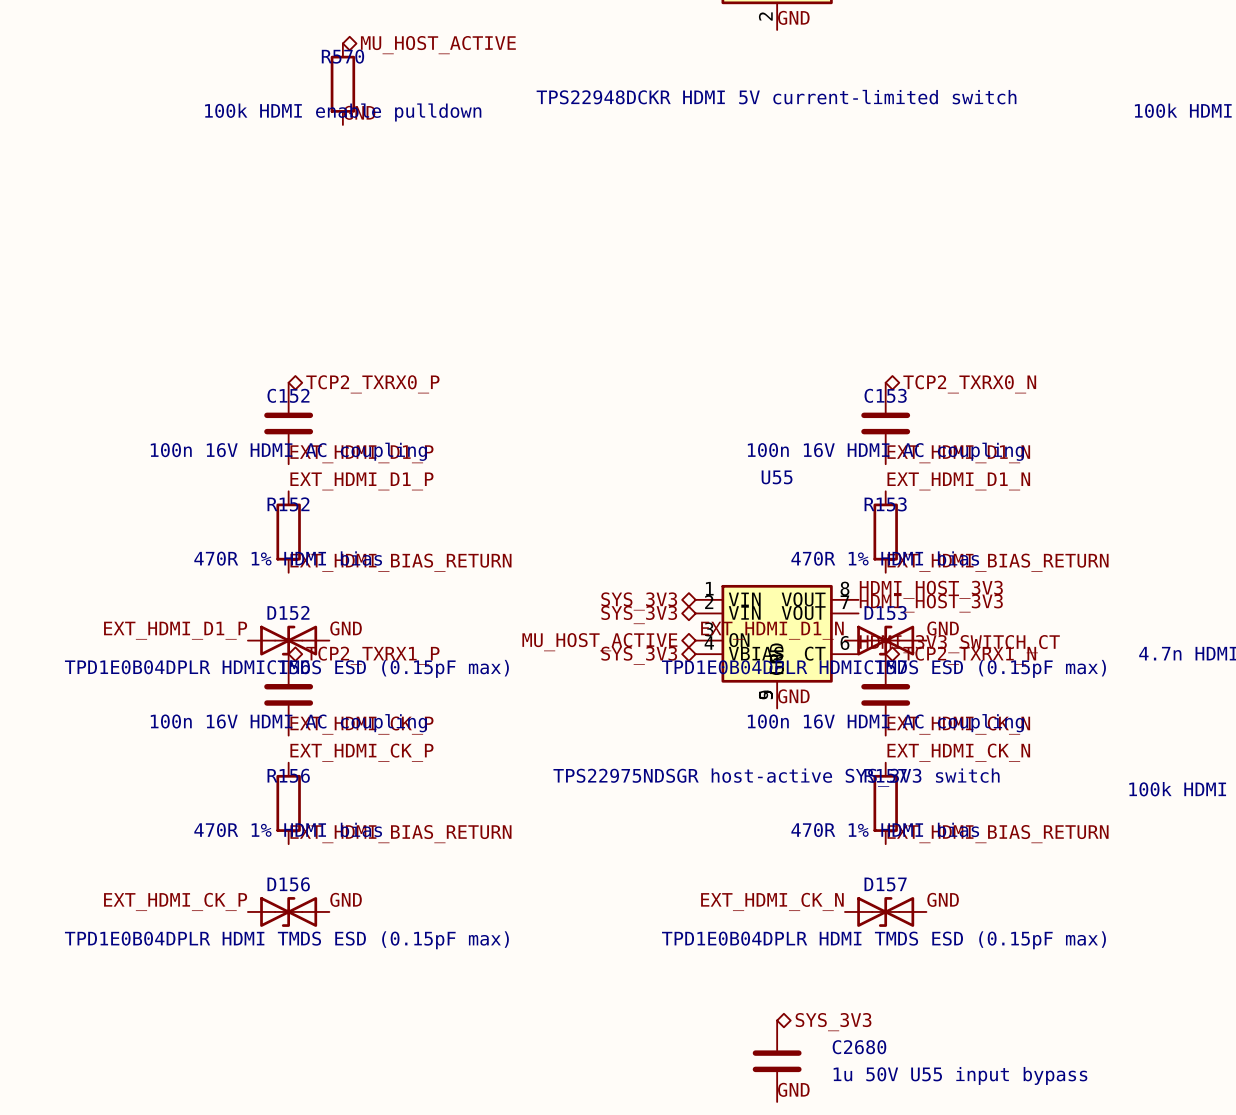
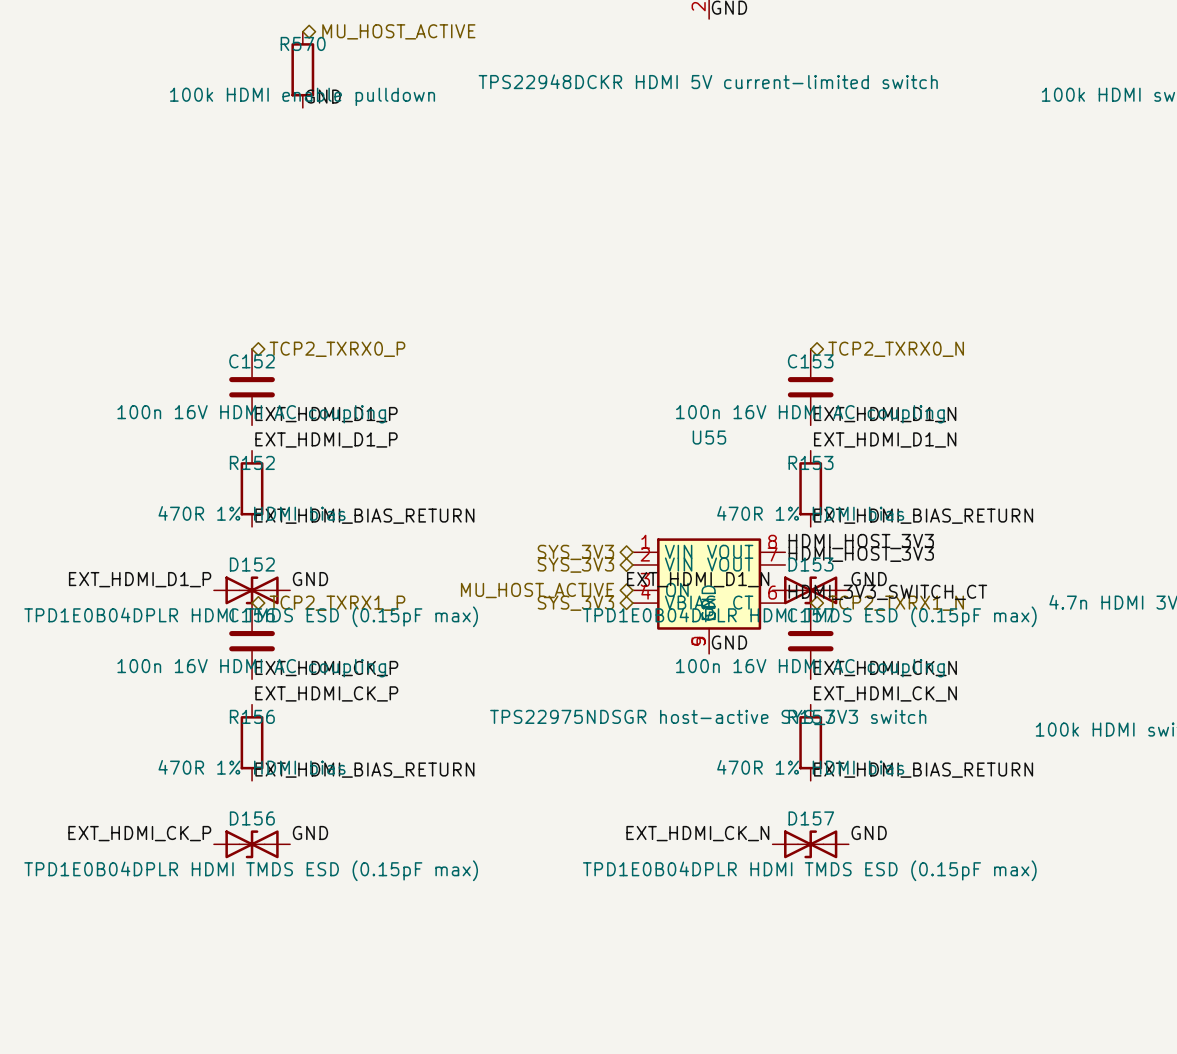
hierarchical label: SYS_3V3 (833, 1022) -> none
C2680: 1u 50V U55 input bypass (777, 1061) -> none
label: GND (793, 1089) -> none

